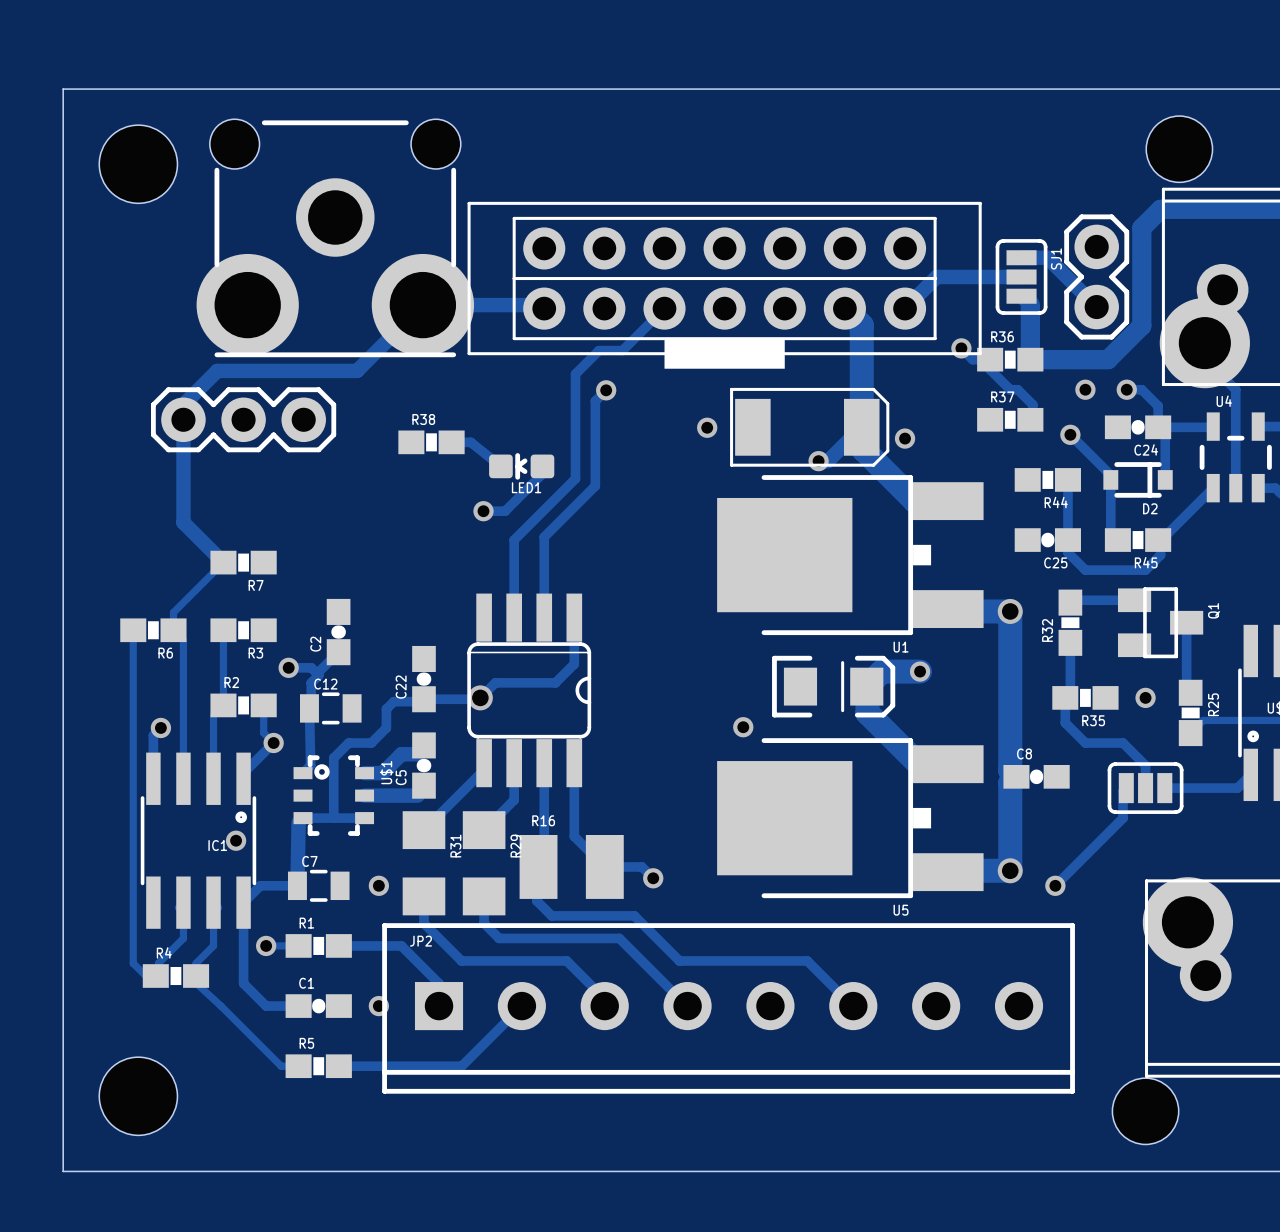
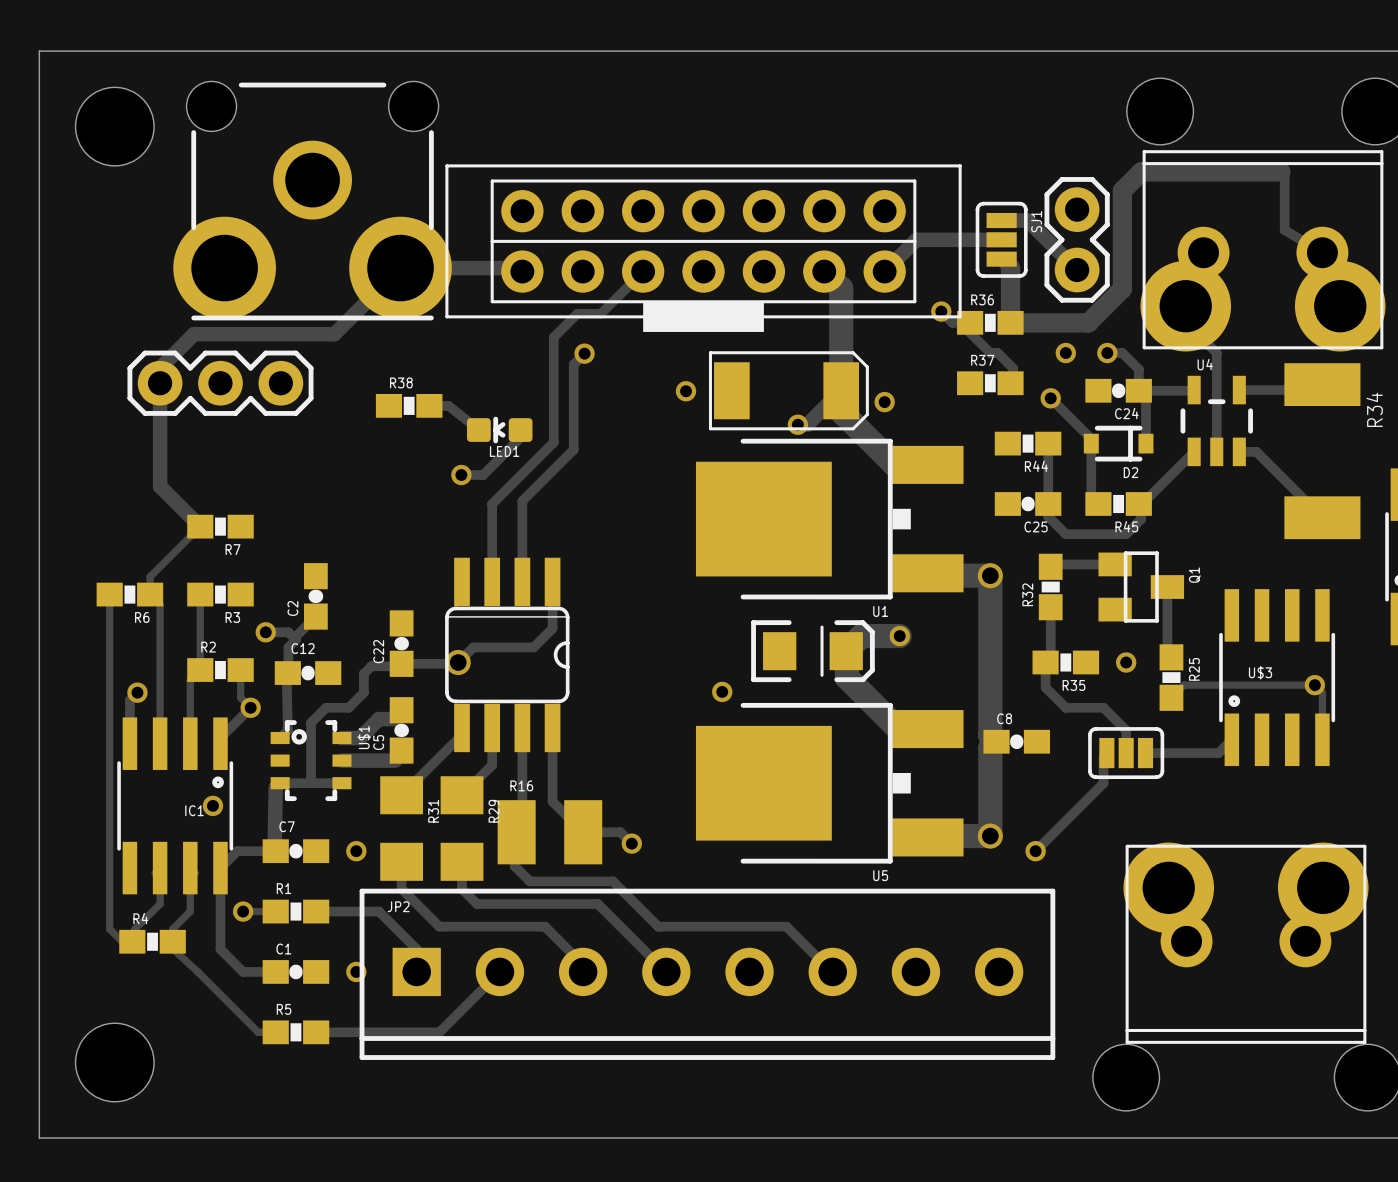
C12 footprint: [300, 692, 362, 725] -> [274, 661, 342, 685]
C7 footprint: [287, 869, 350, 902] -> [262, 839, 330, 864]

